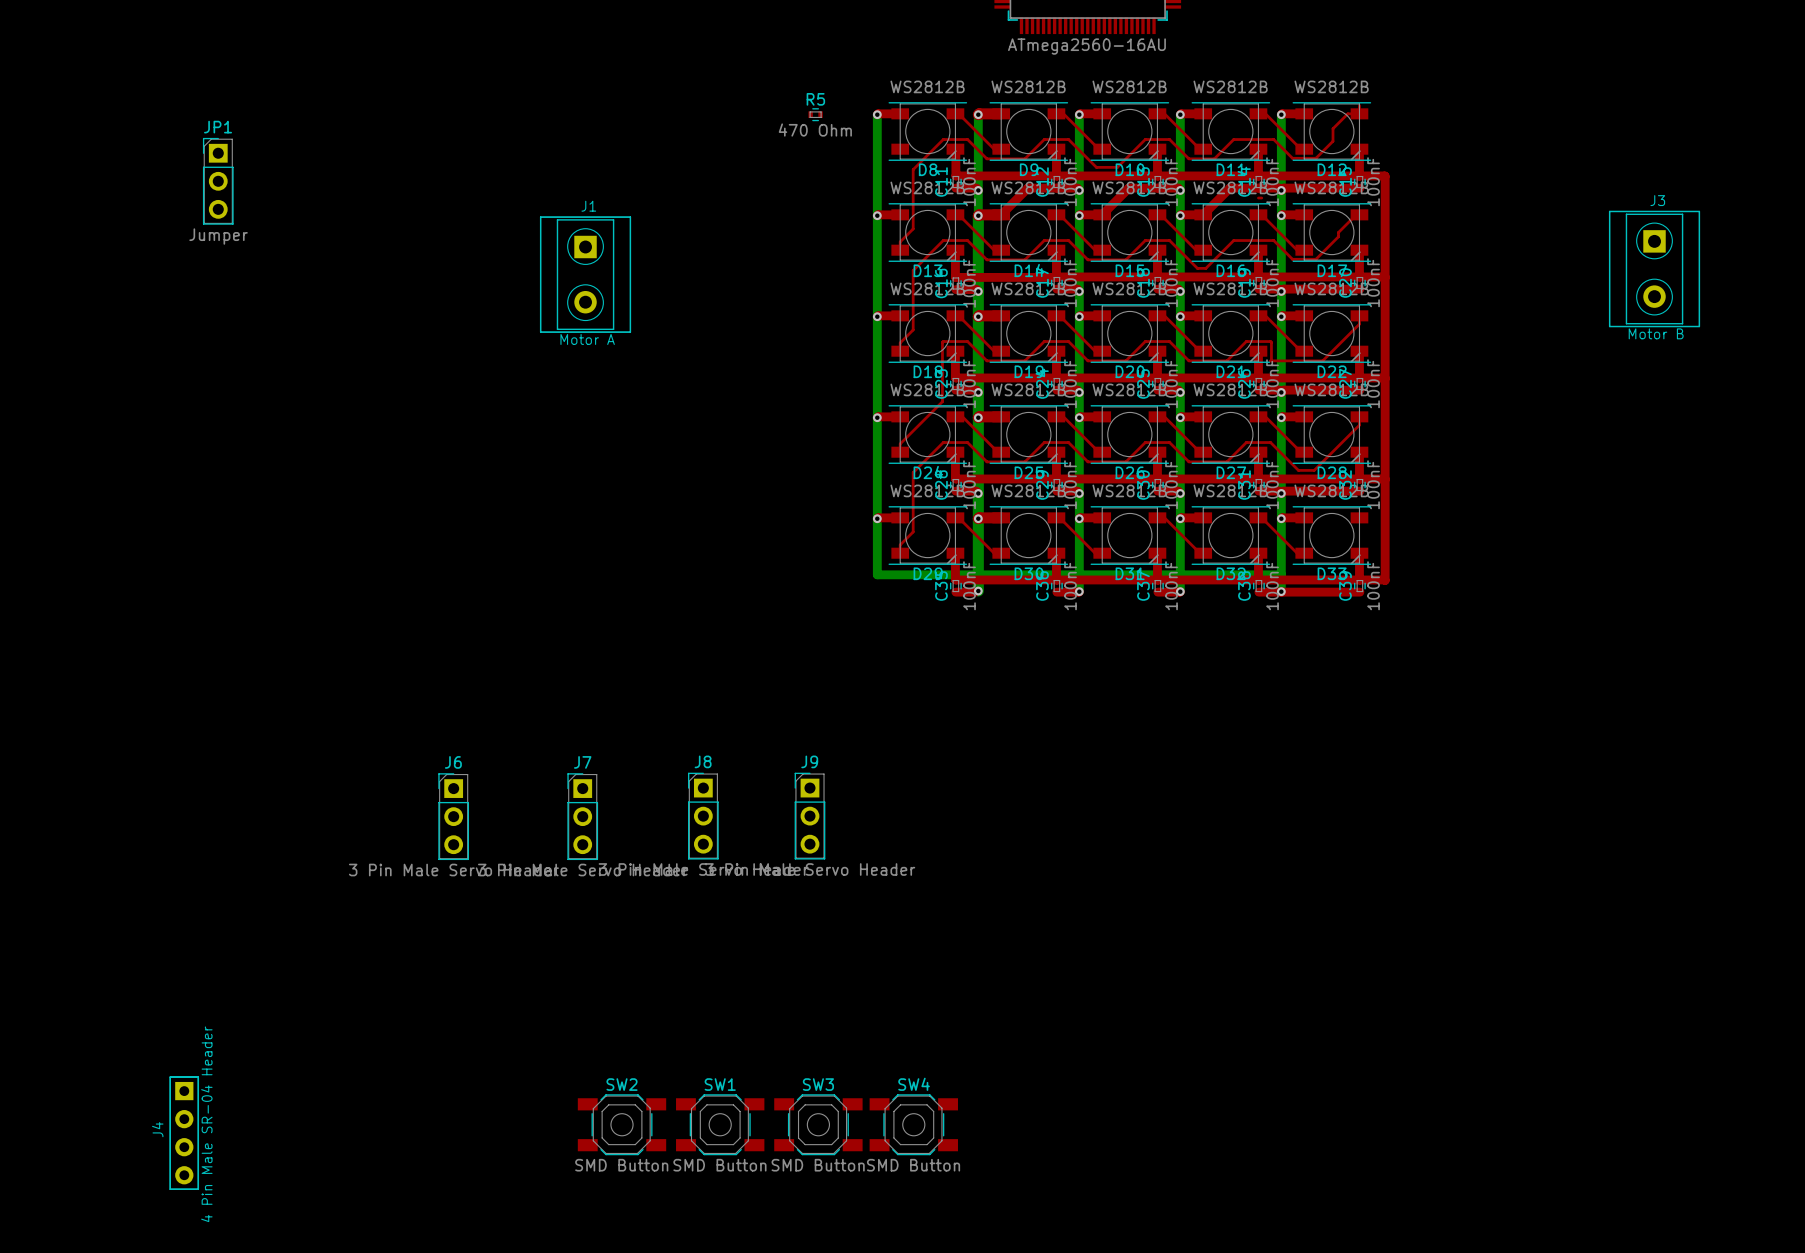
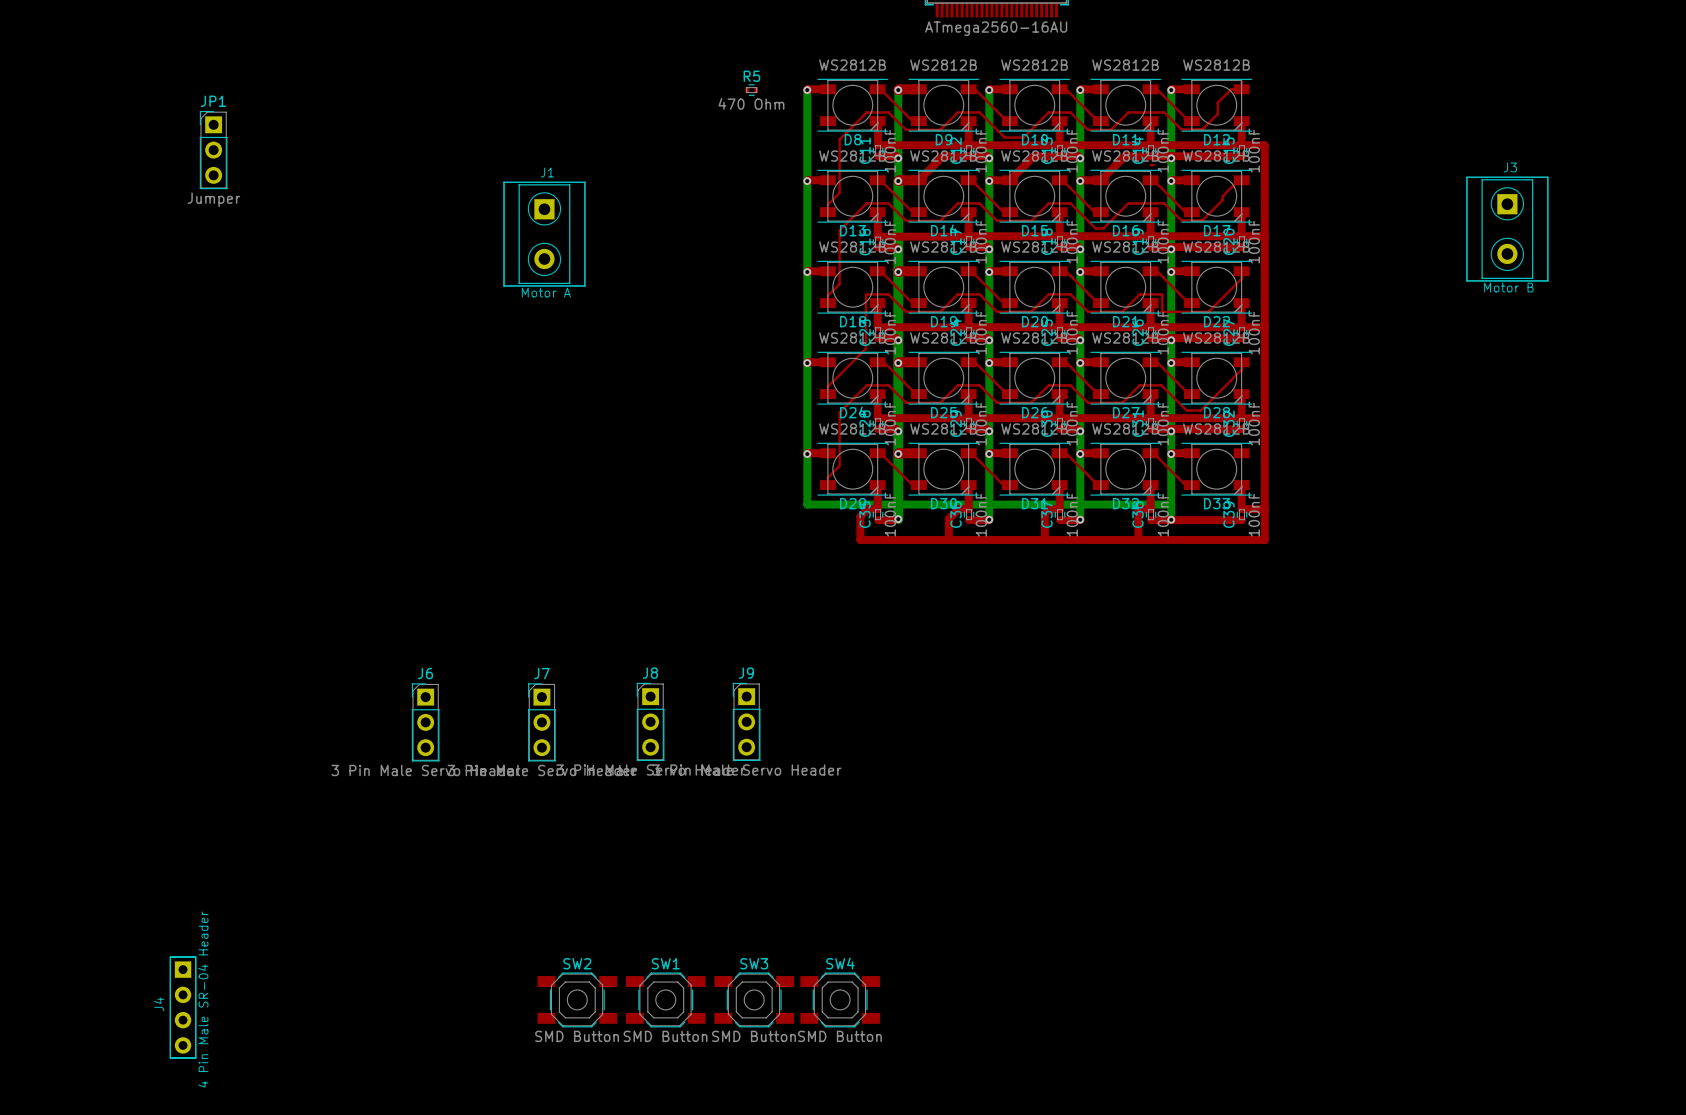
top track: (955, 579) (1045, 579) -> (948, 539) (948, 518) (958, 509)
top track: none -> (878, 509) (867, 509) (860, 516) (860, 539) (1264, 539) (1264, 509)
top track: (1056, 579) (1146, 579) -> (1044, 539) (1044, 513) (1049, 509)
top track: (1157, 579) (1247, 579) -> (1138, 539) (1138, 511) (1140, 509)
top track: (1258, 579) (1359, 579) -> none

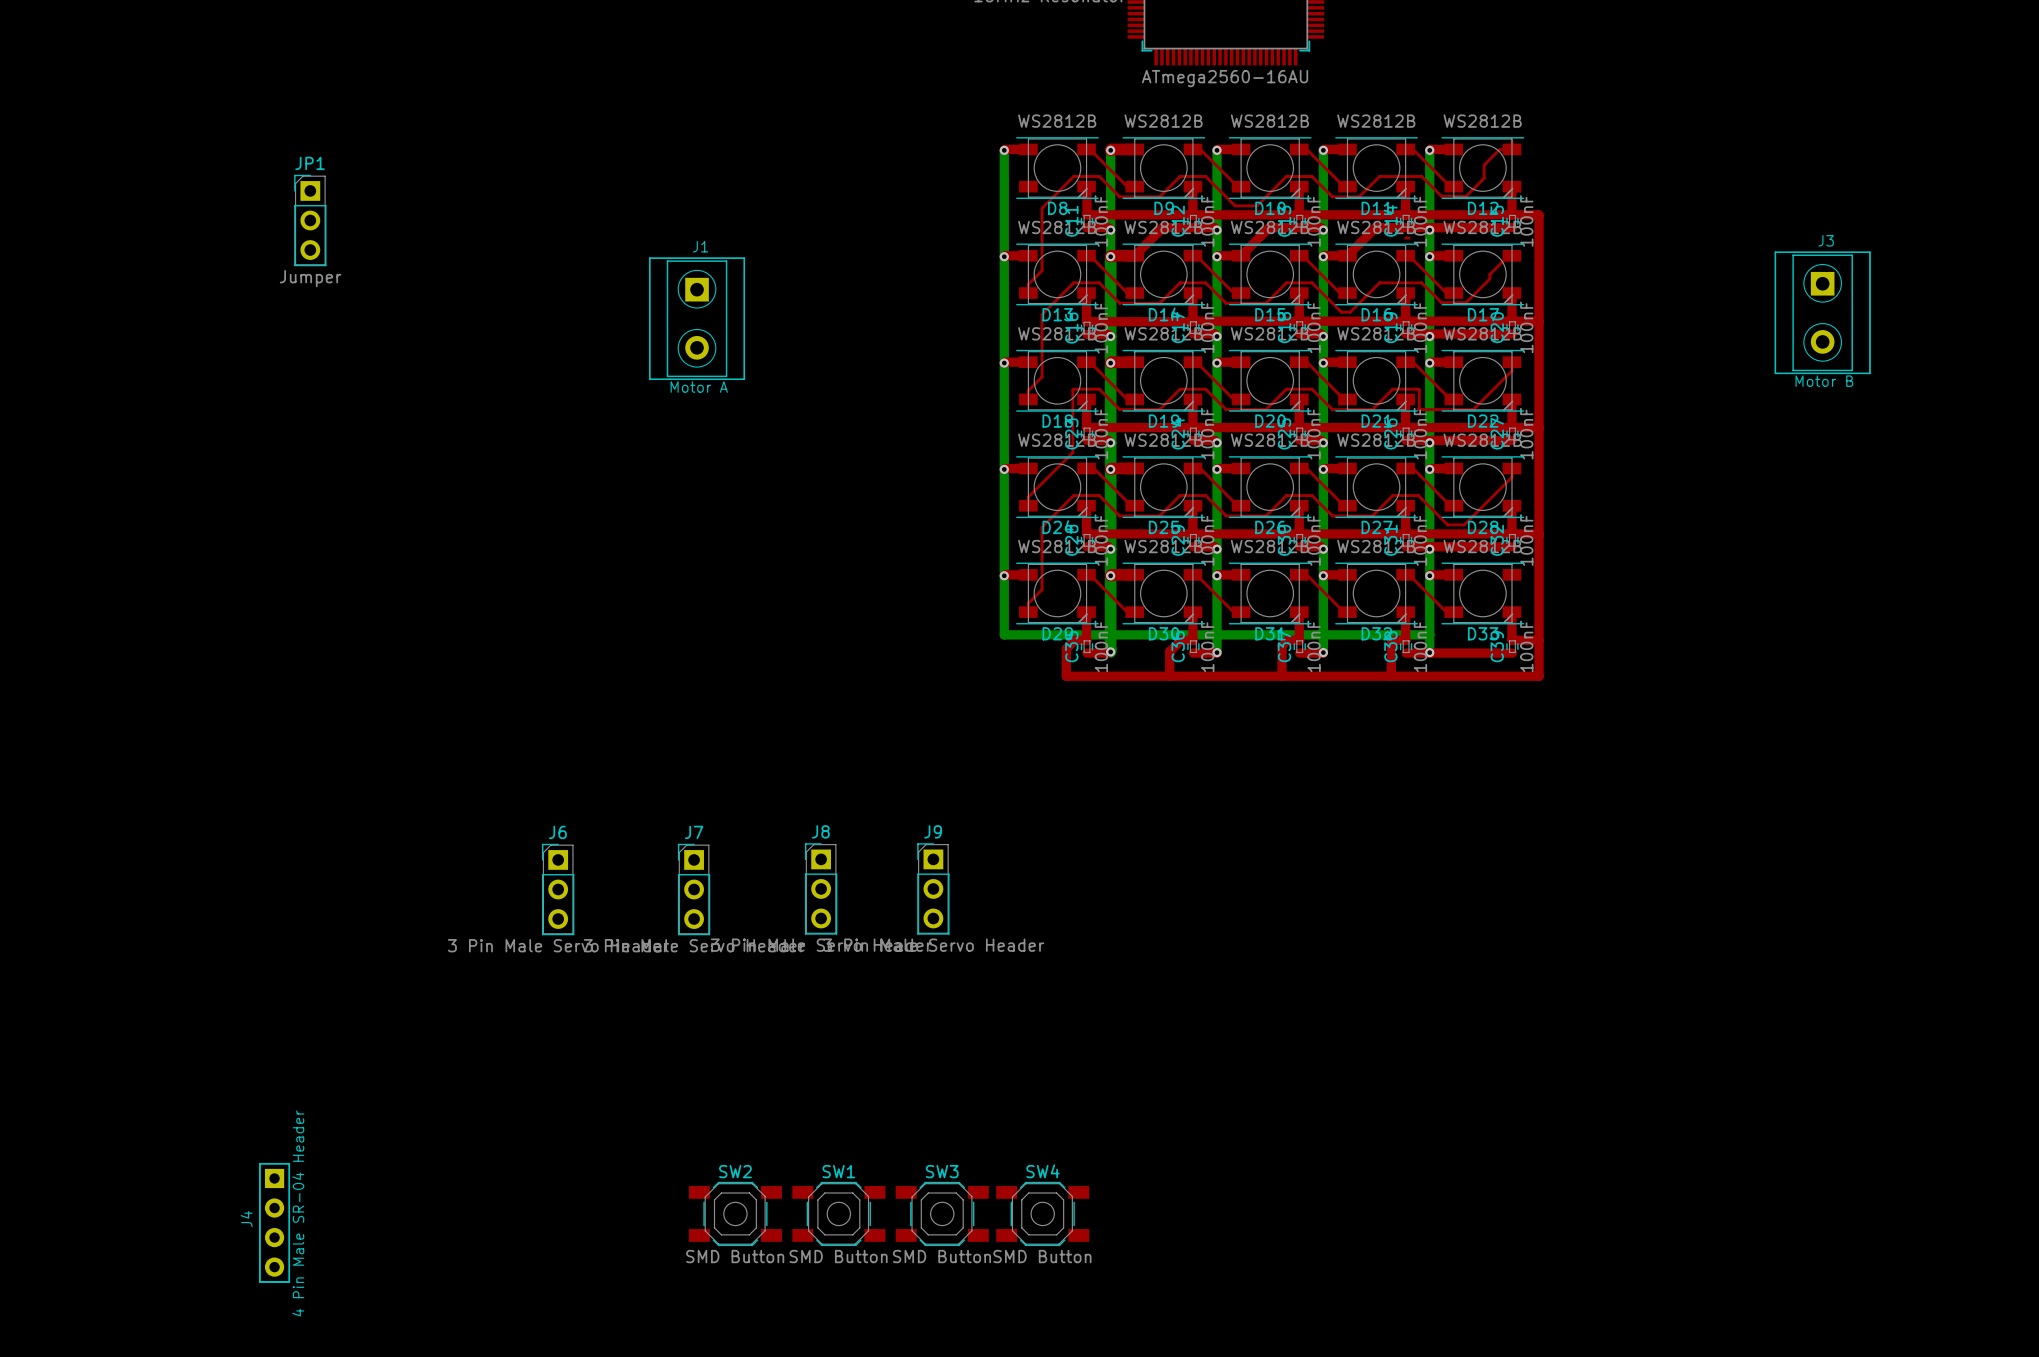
R5: 470 Ohm (751, 90) -> none

